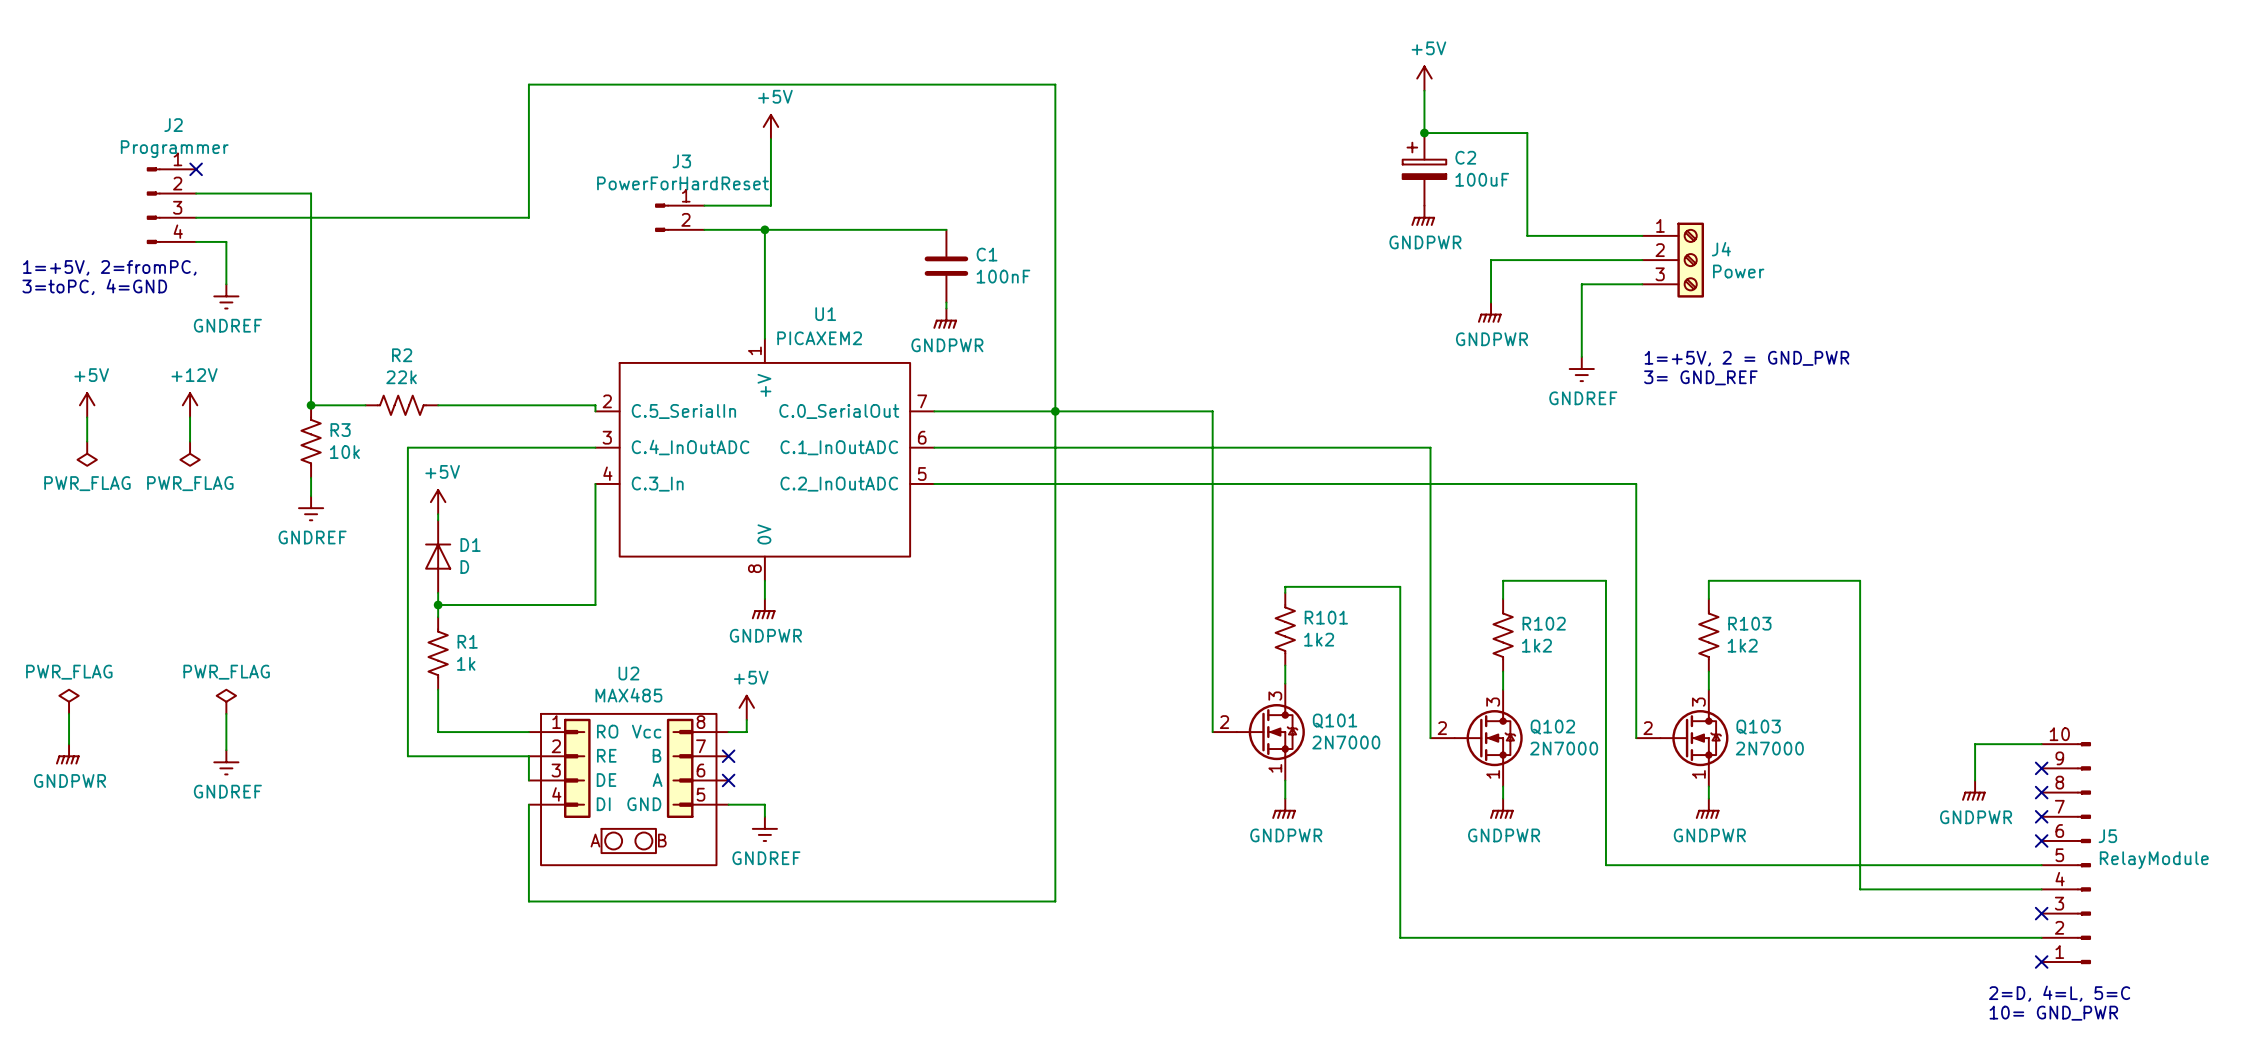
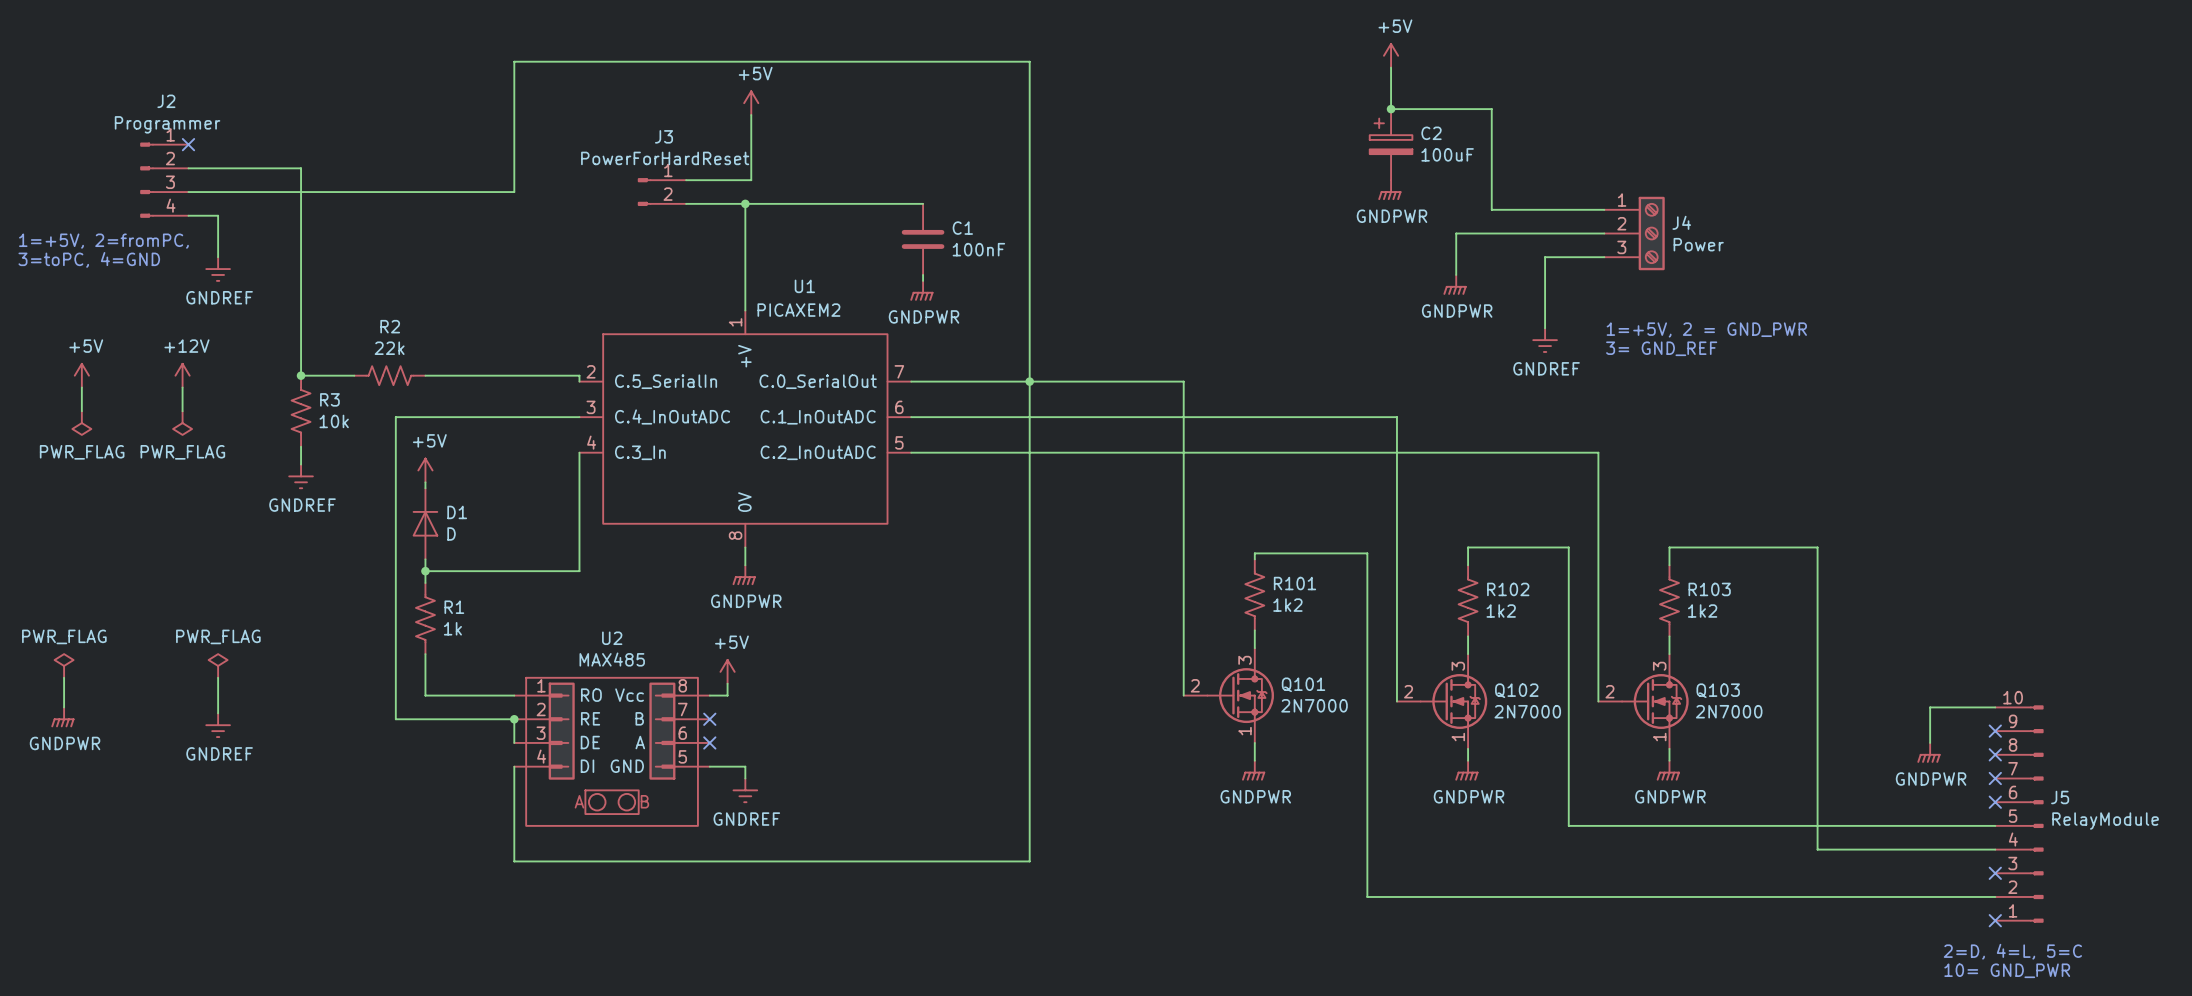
junction: none -> (514, 719)

